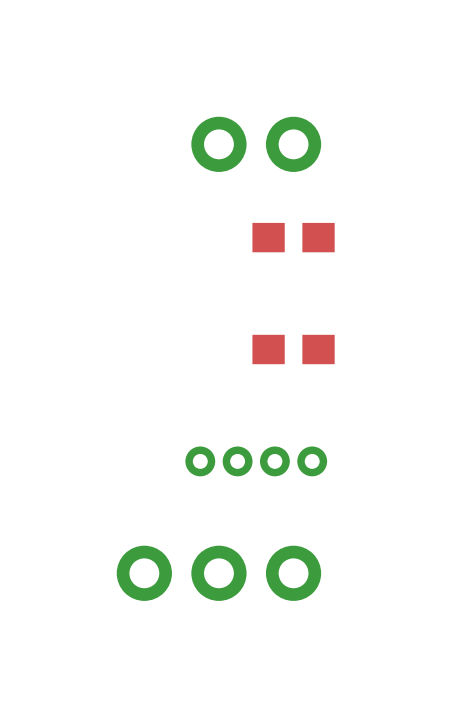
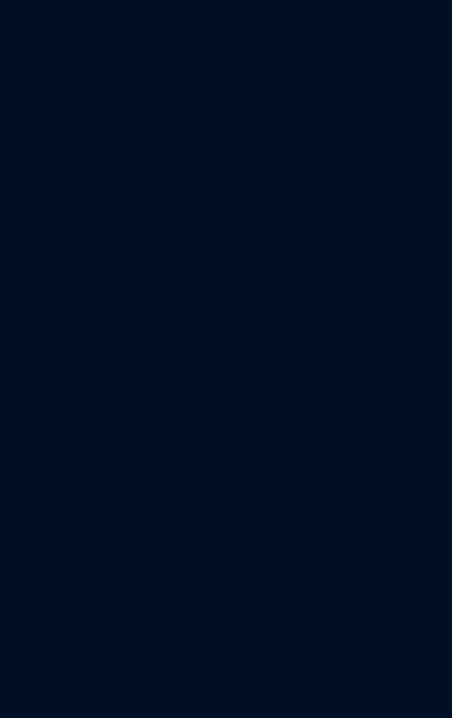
part: (256, 144) -> none
part: (293, 237) -> none
part: (293, 349) -> none
part: (256, 461) -> none
part: (218, 573) -> none

